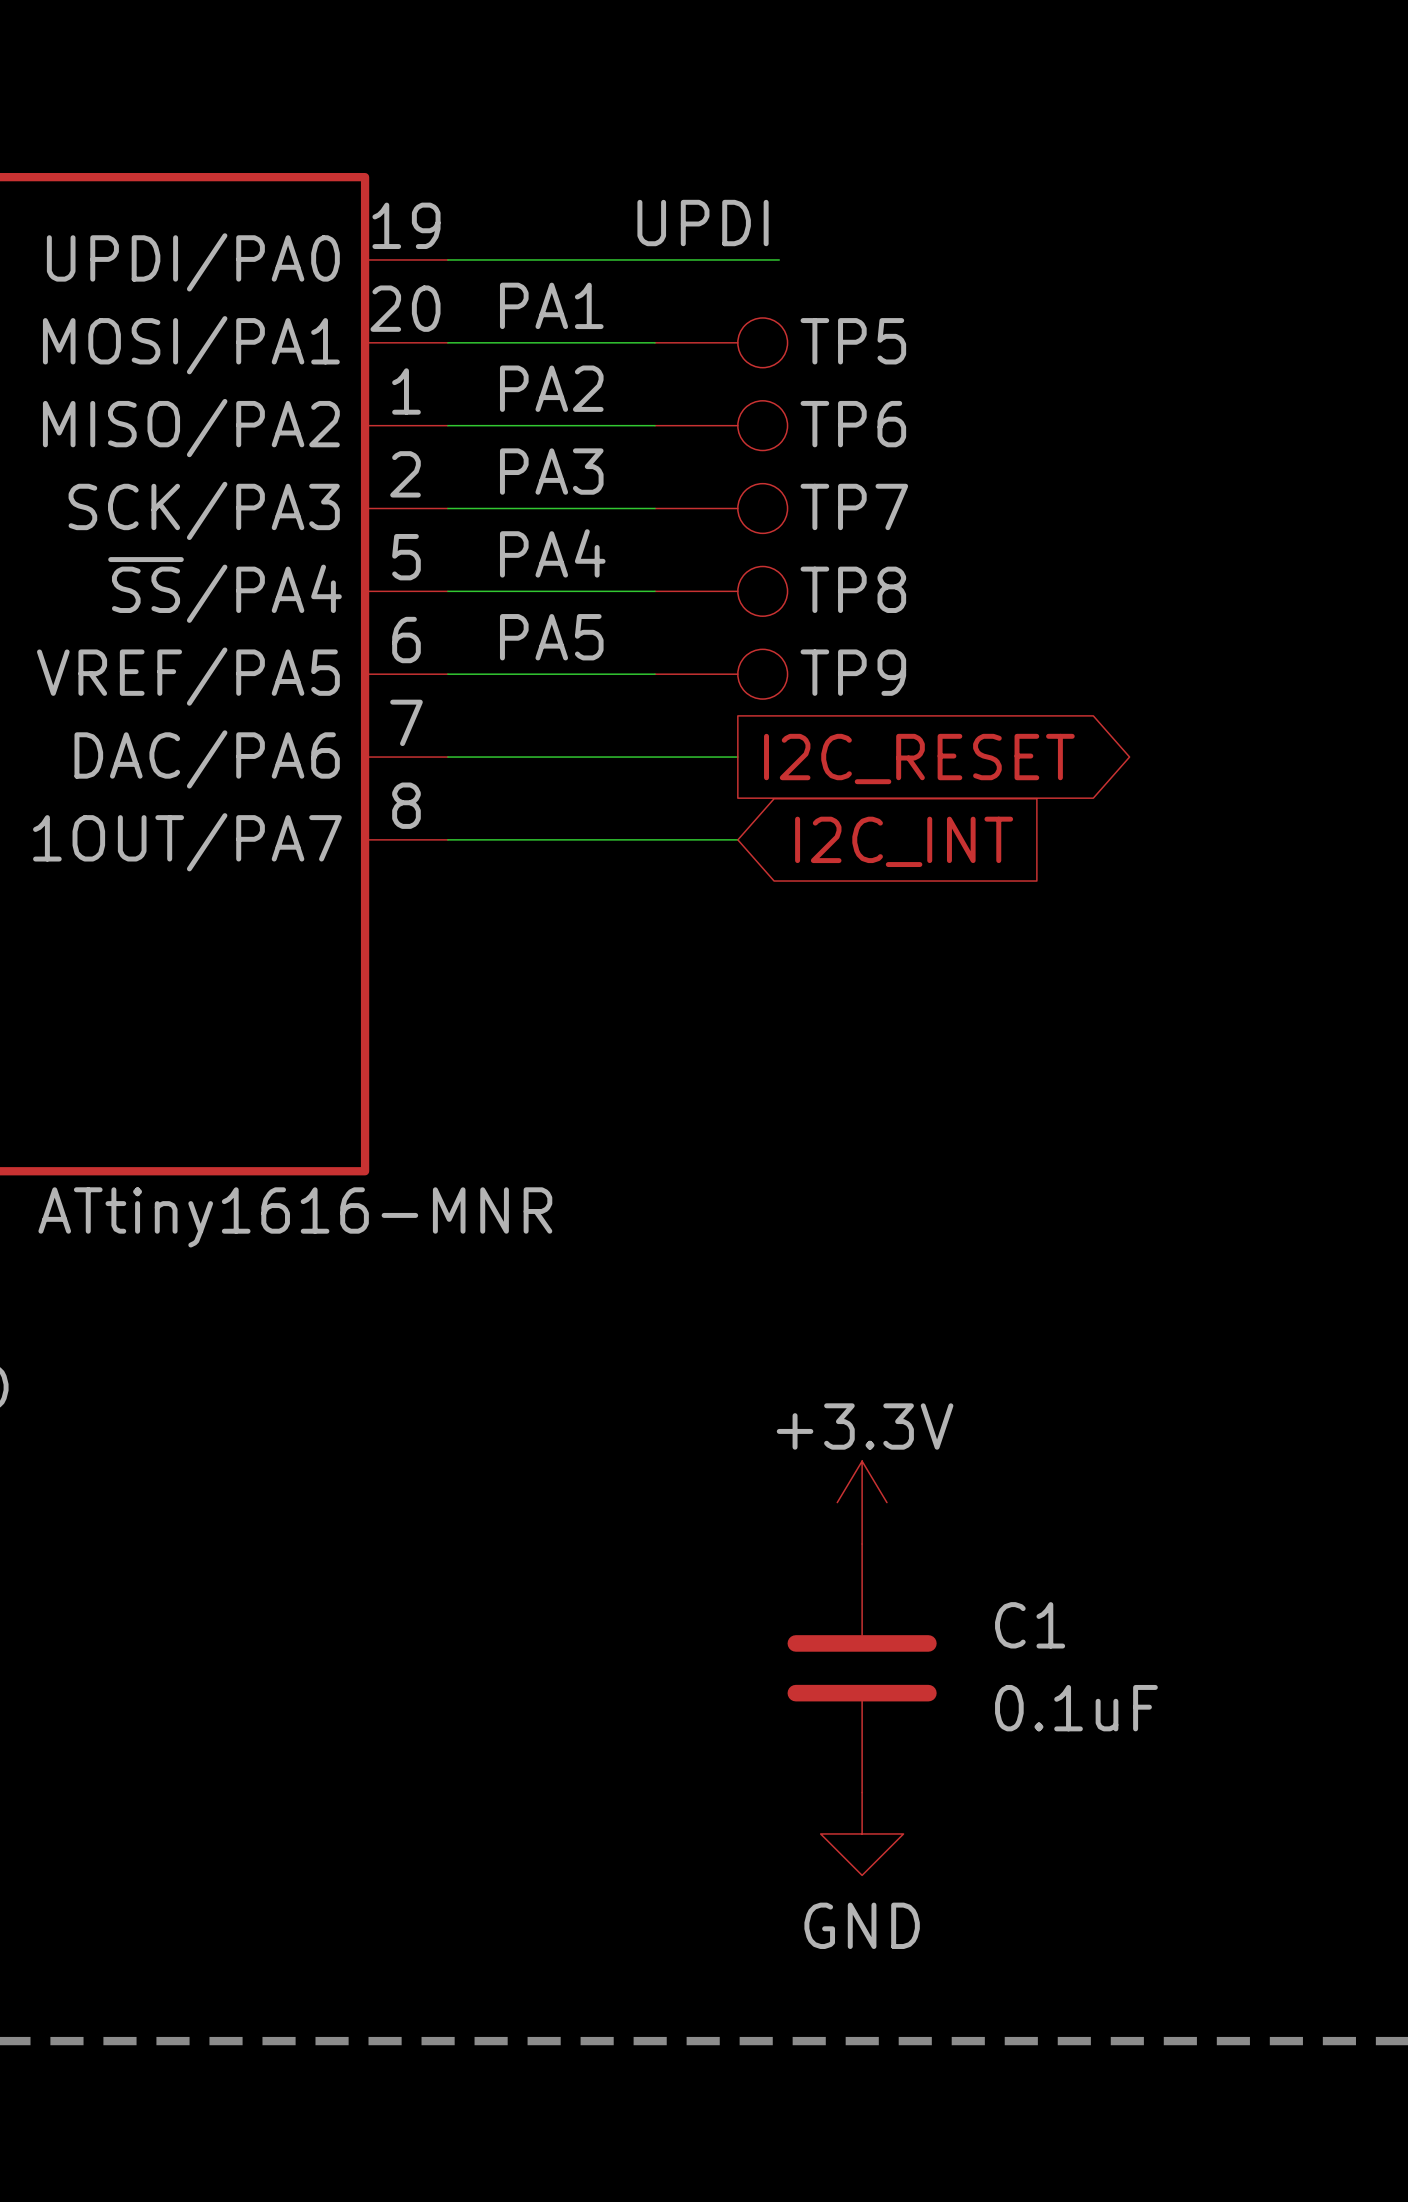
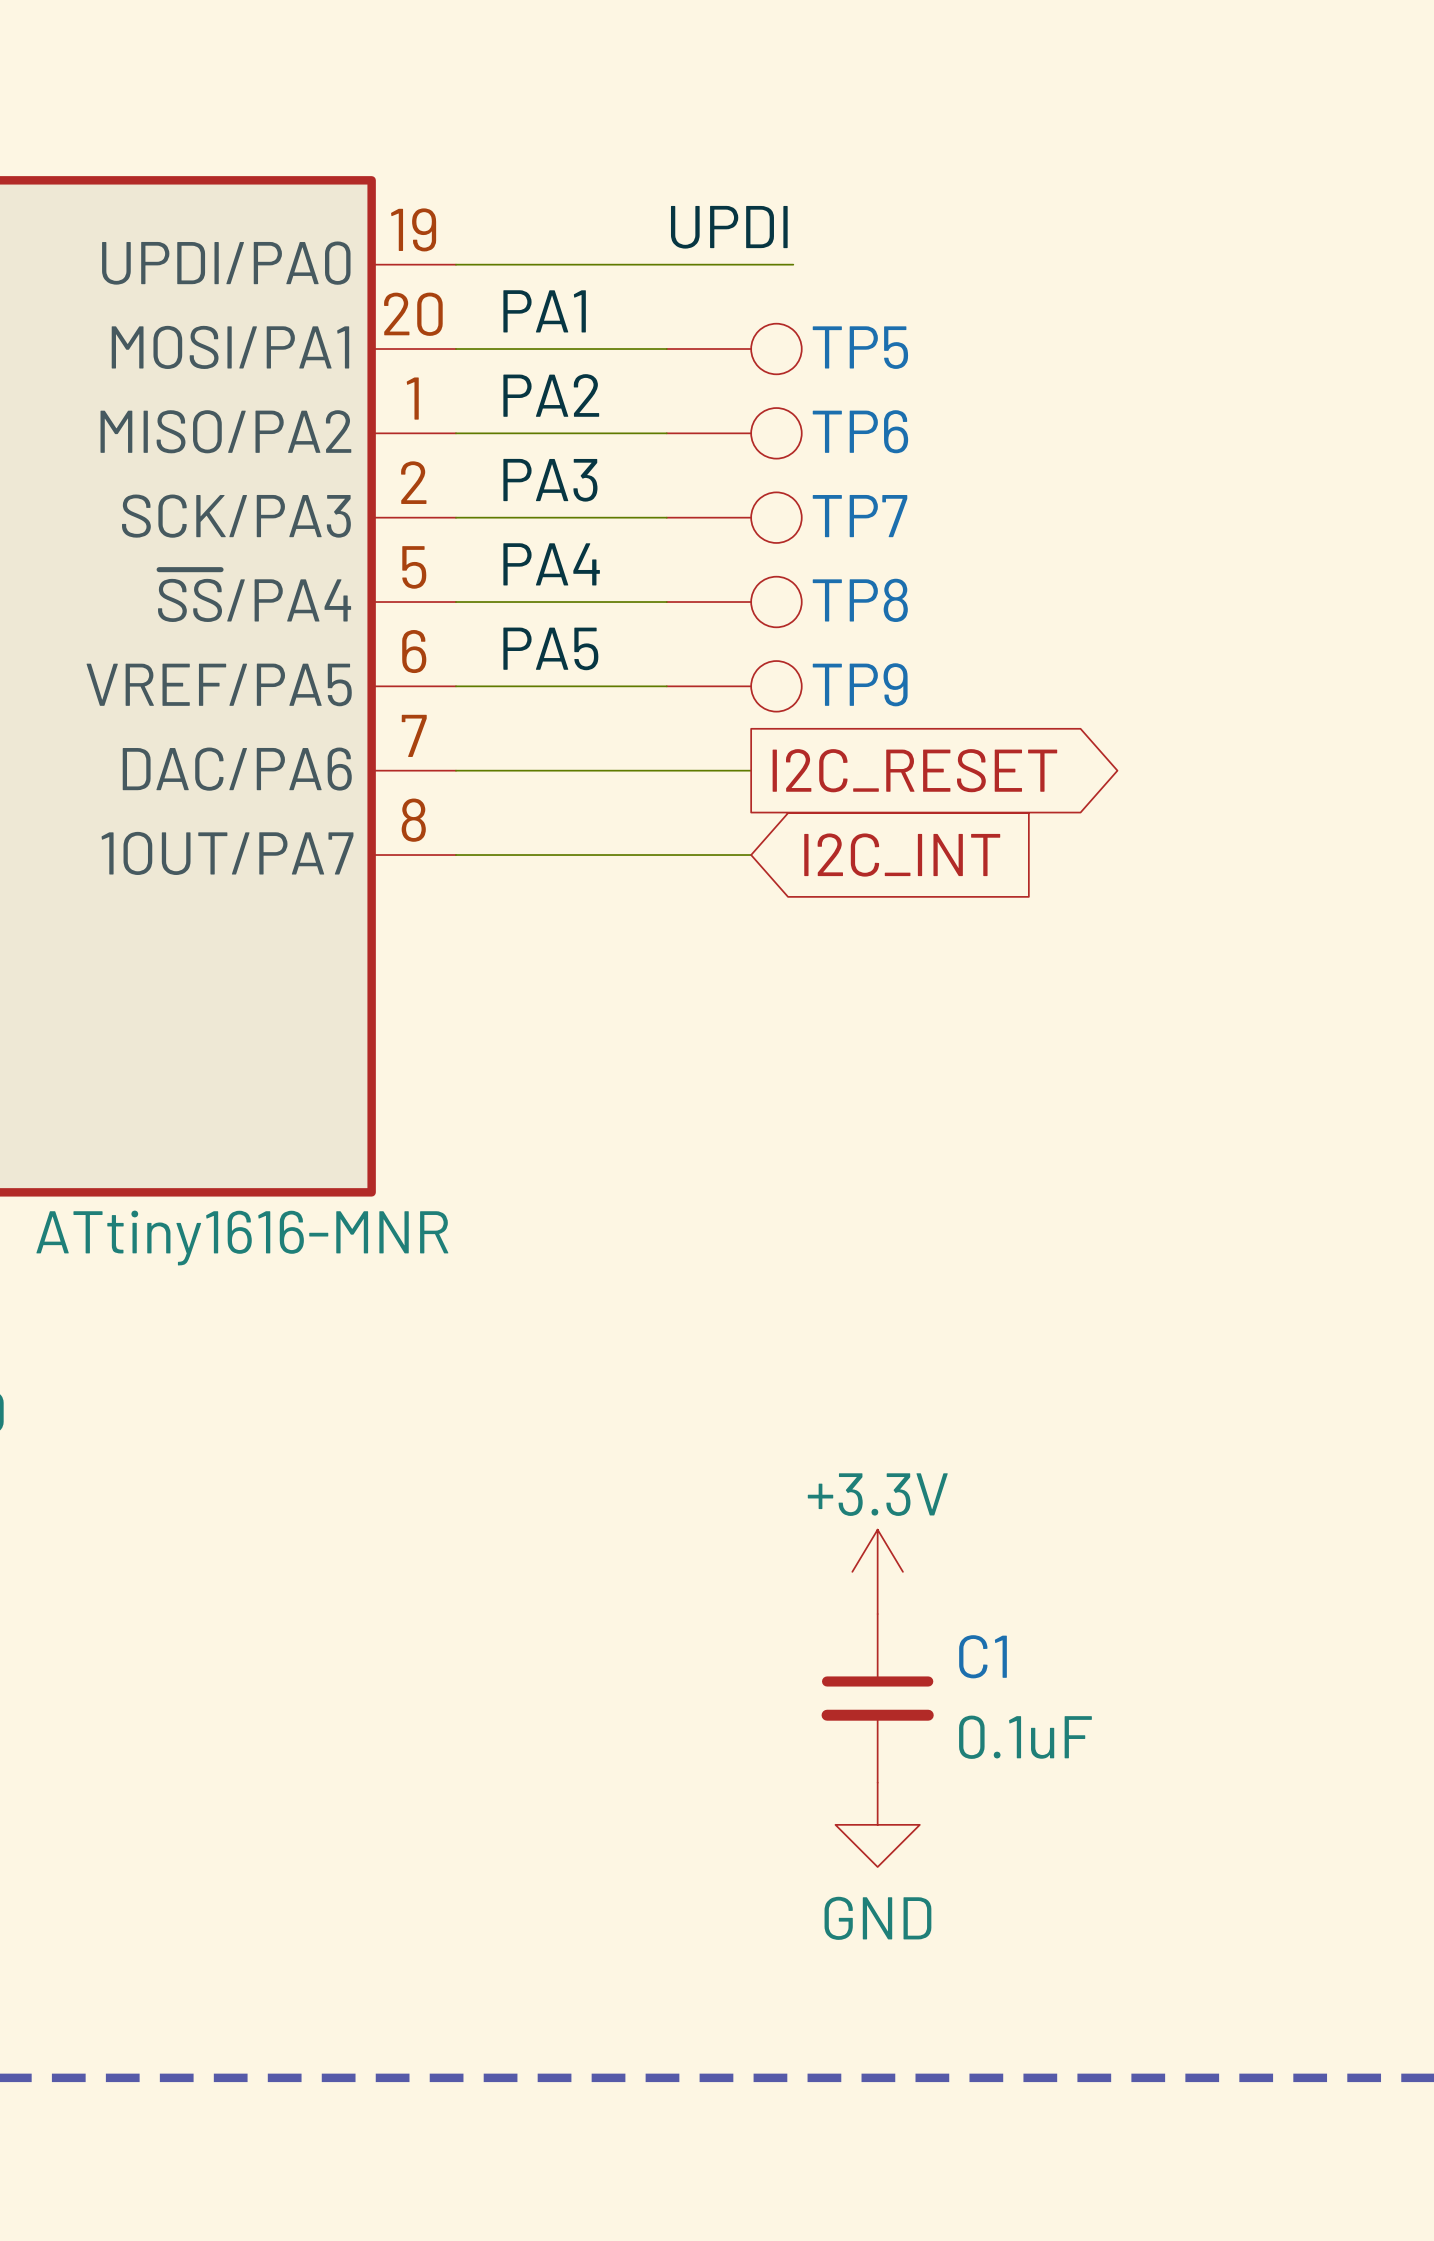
power symbol position: +3.3V (862, 1502) -> +3.3V (877, 1571)
C1 symbol: [787, 1544, 937, 1793] -> [821, 1614, 934, 1783]
power symbol position: GND (862, 1833) -> GND (877, 1824)

